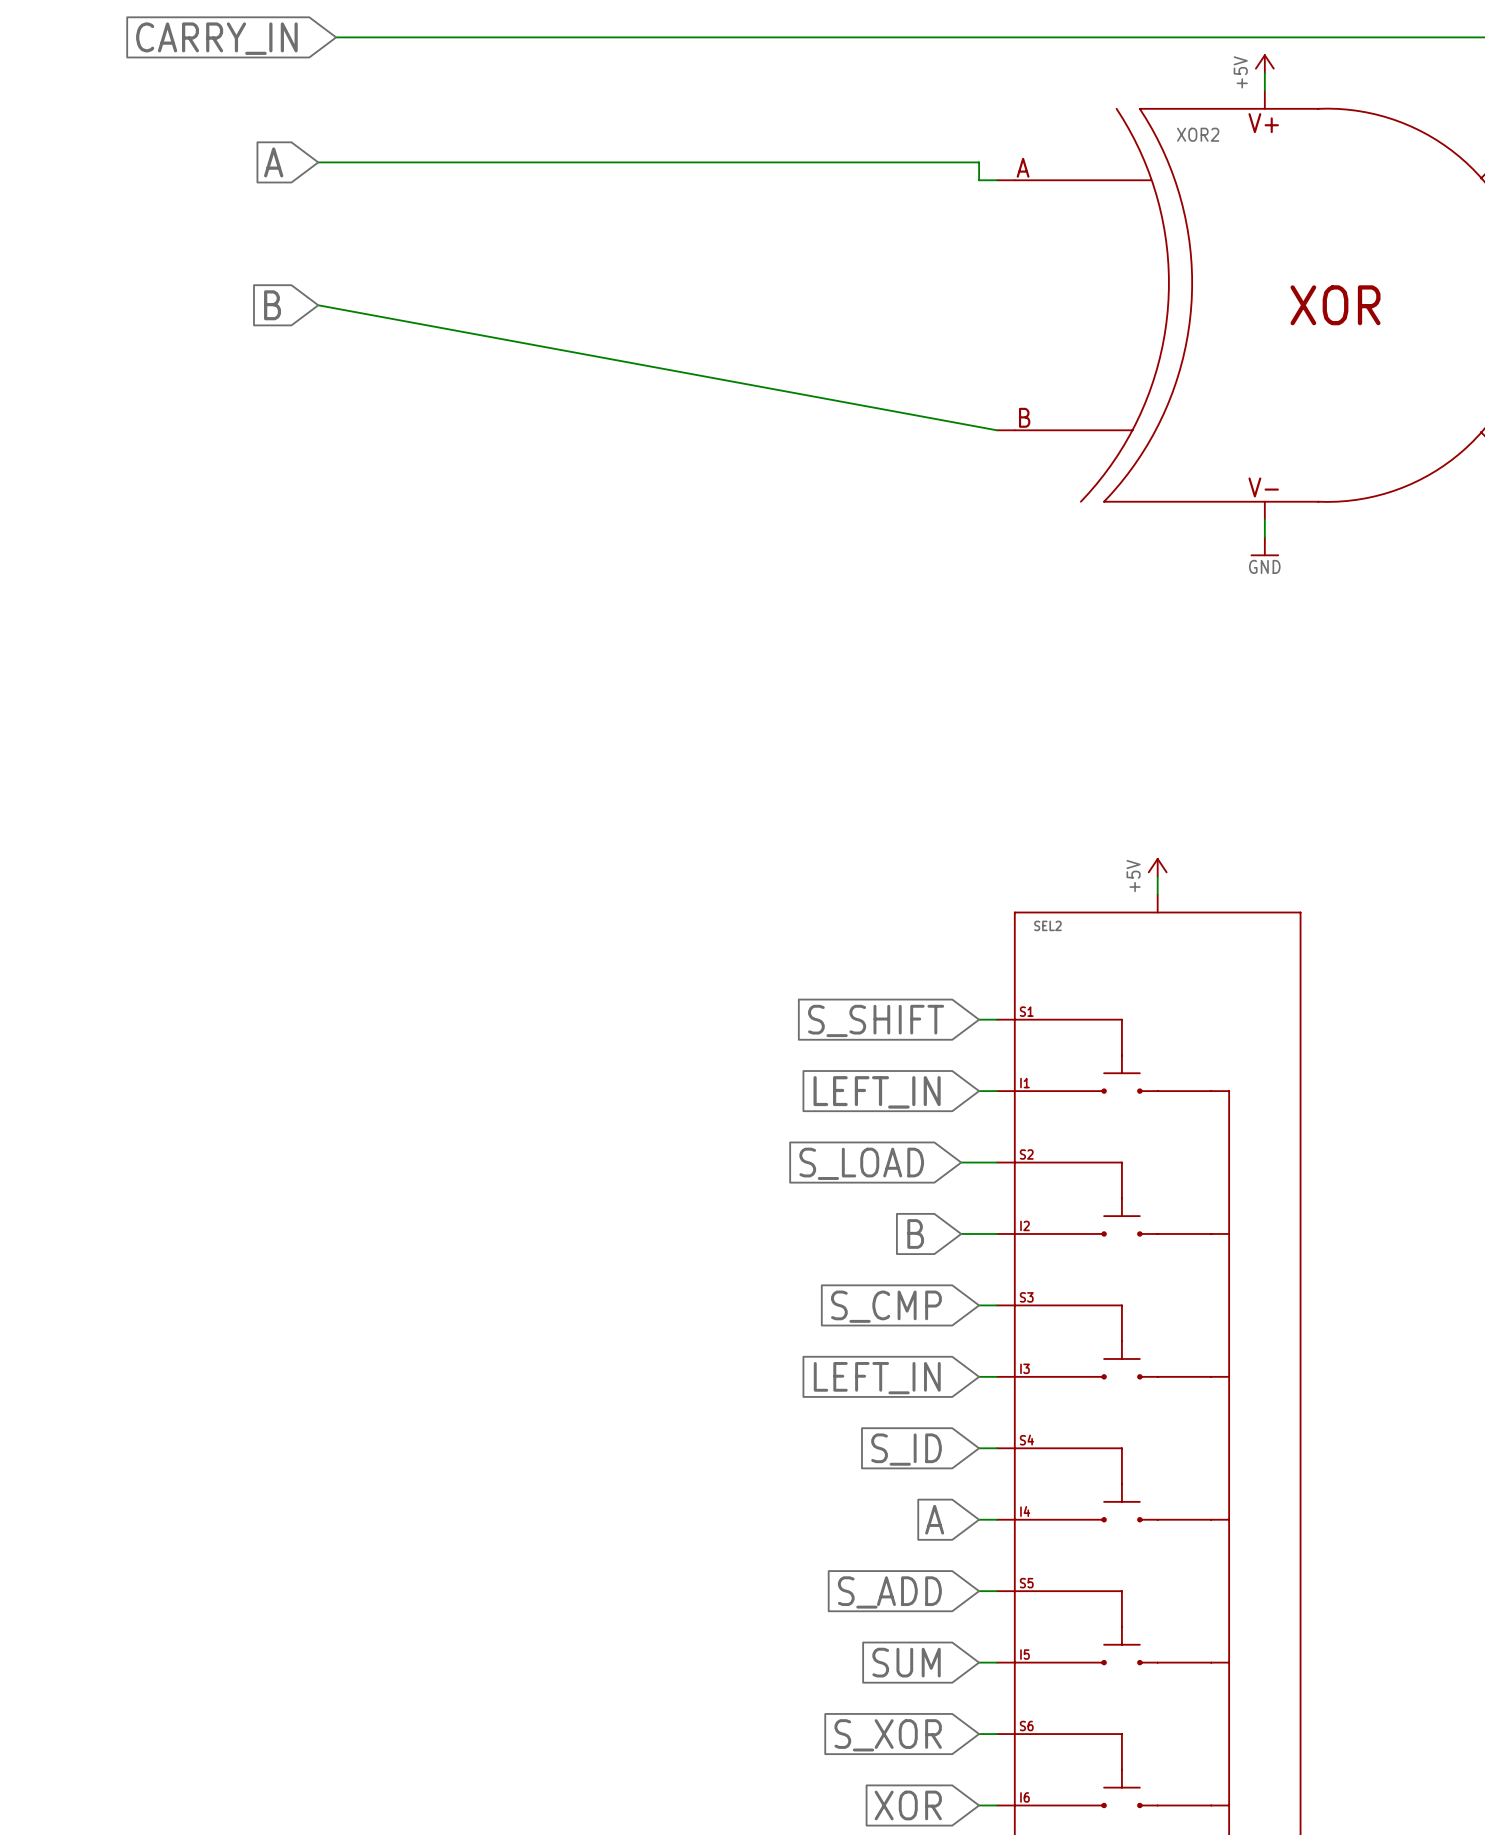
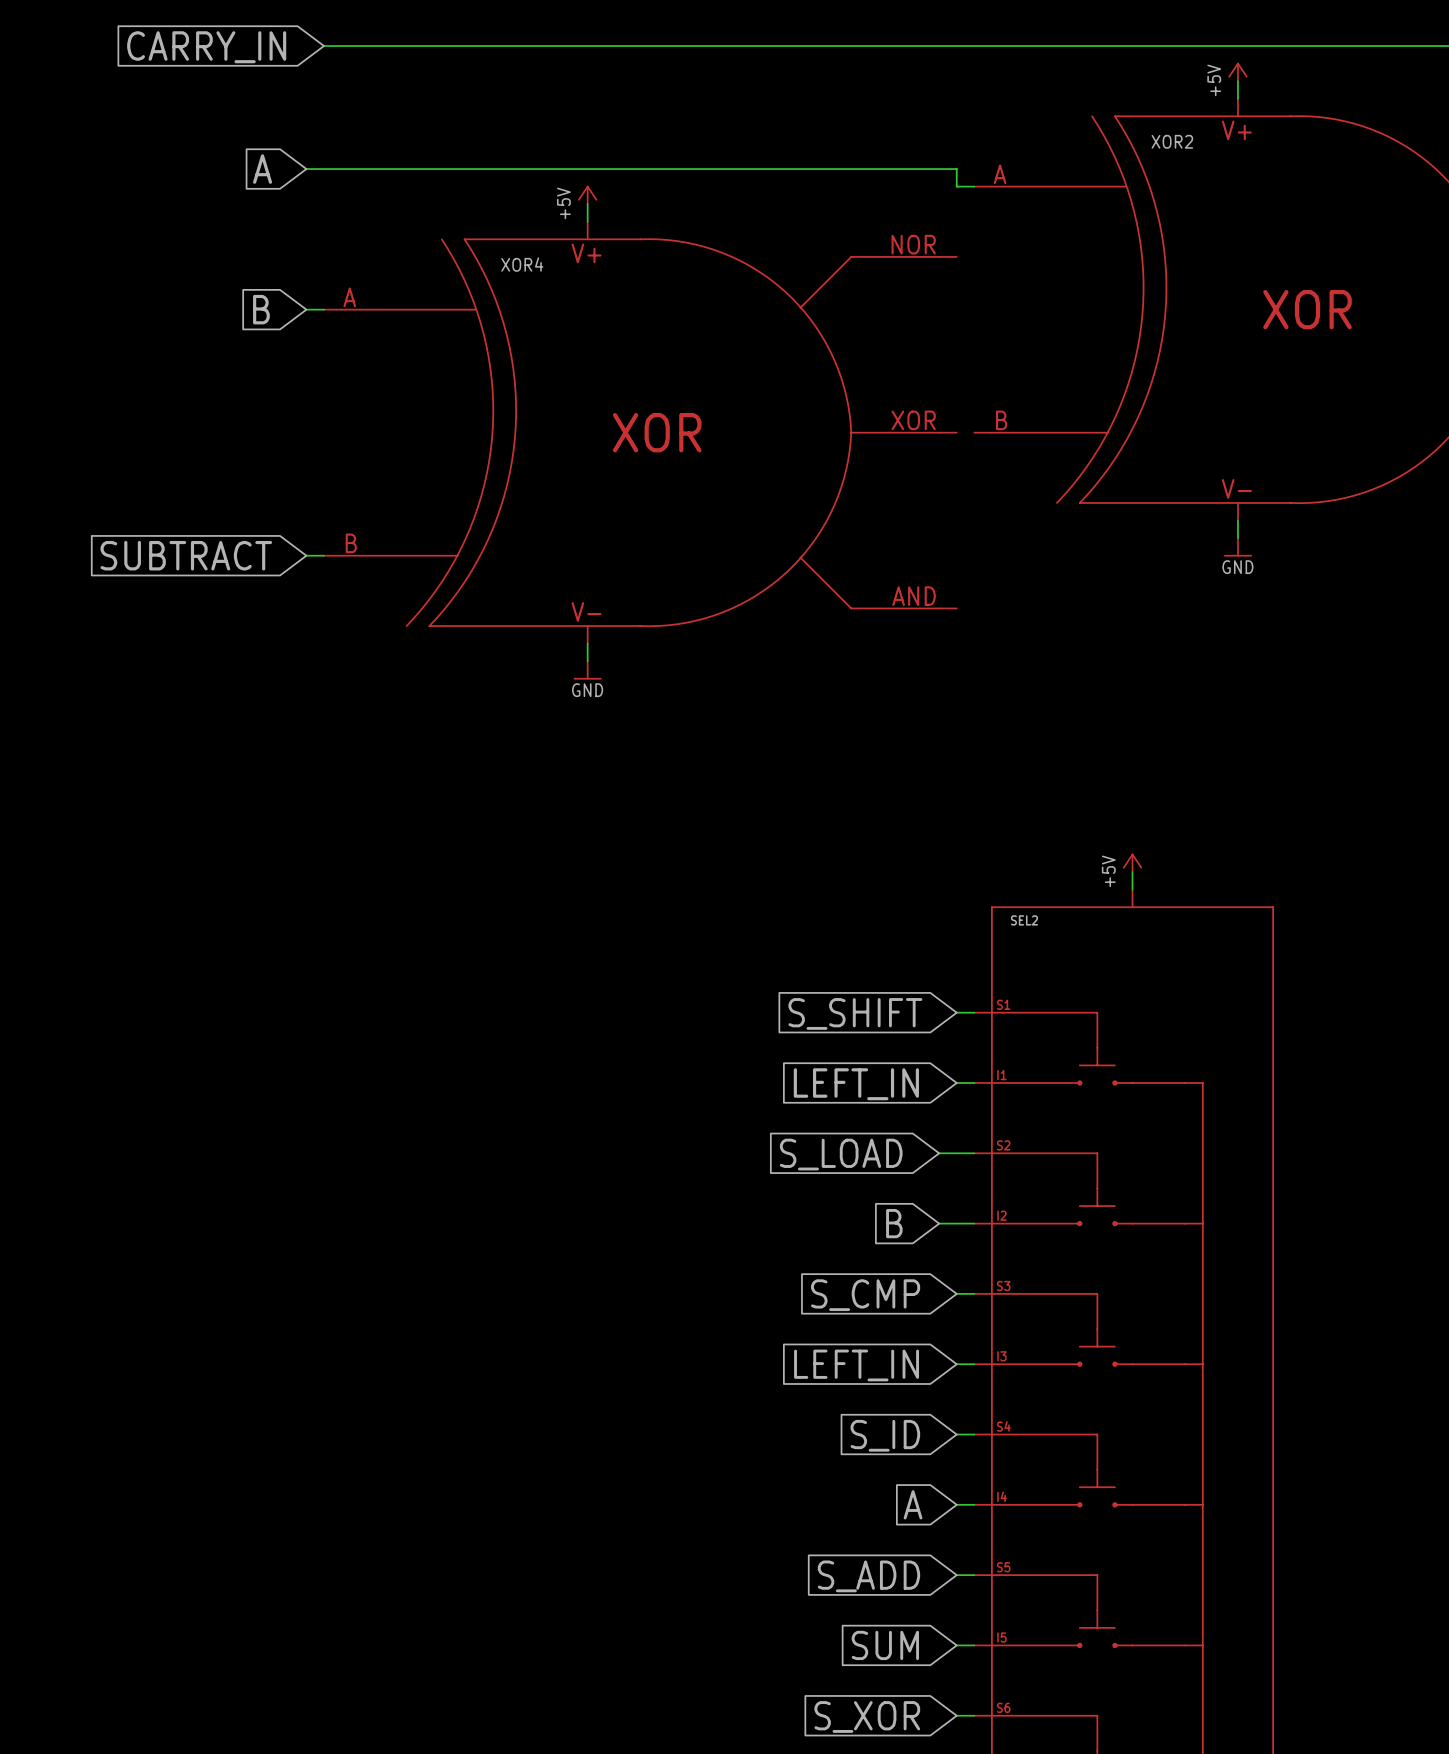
power symbol: none -> +5V (587, 194)
wire: none -> (587, 204) (587, 221)
wire: (318, 305) (996, 430) -> (306, 309) (324, 309)
XOR4: none -> (640, 432)
global label: none -> SUBTRACT (186, 555)
wire: none -> (306, 555) (324, 555)
wire: none -> (587, 643) (587, 661)
power symbol: none -> GND (587, 670)

